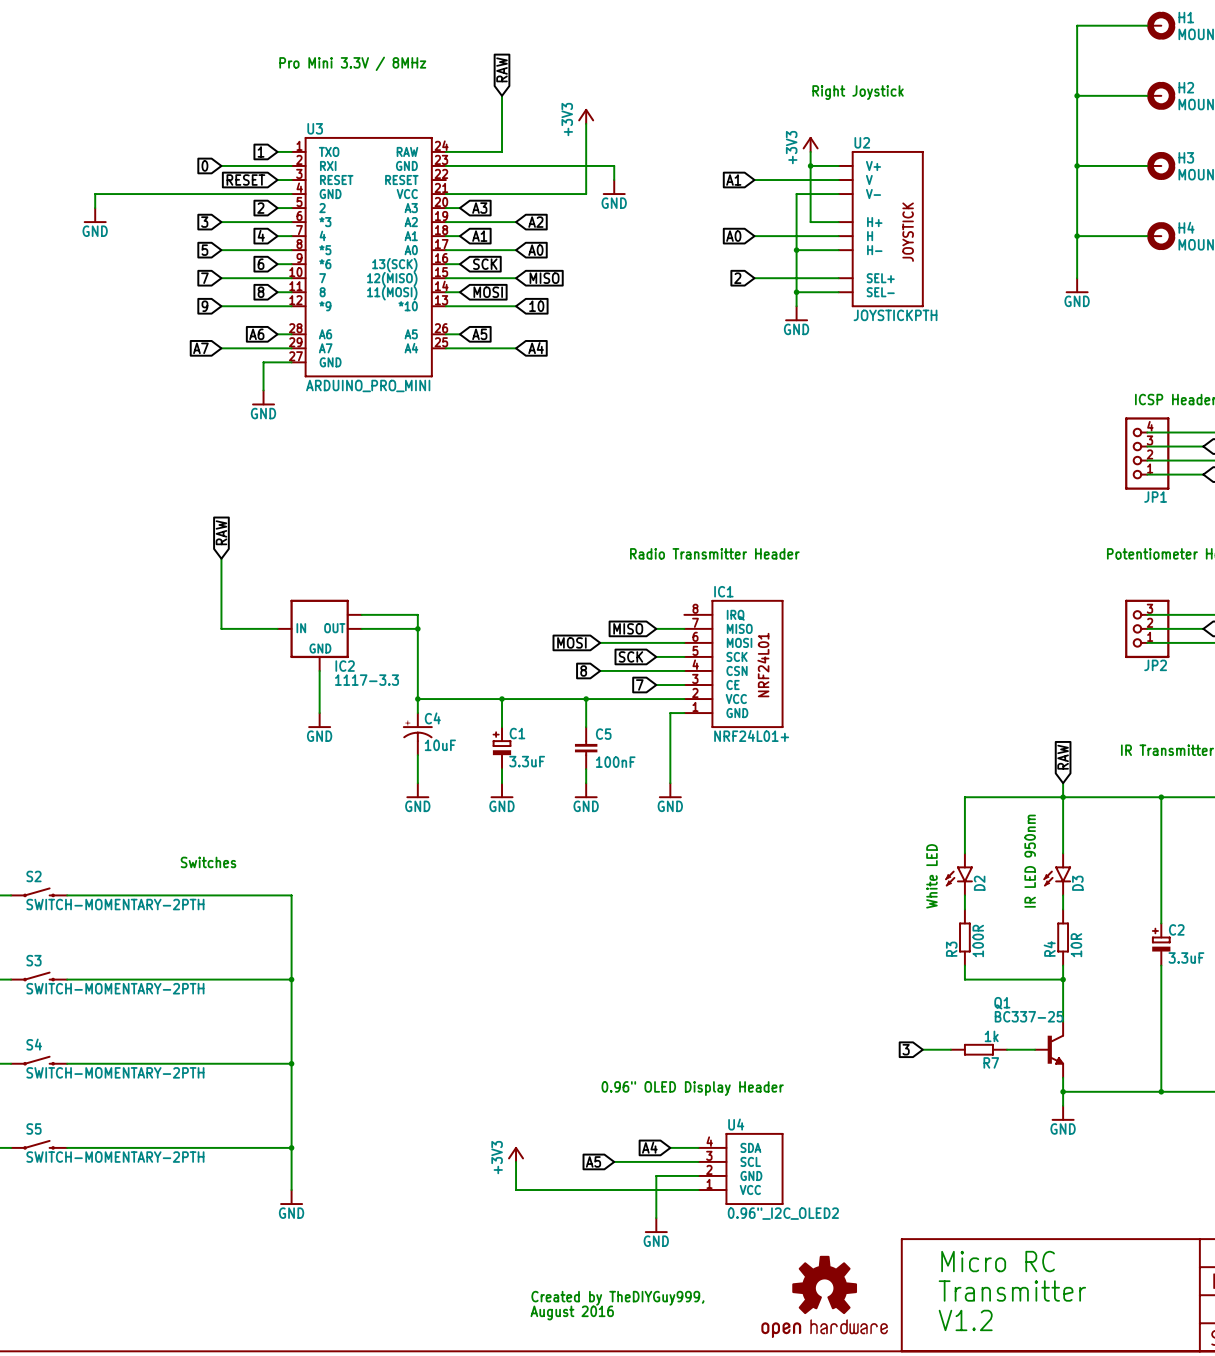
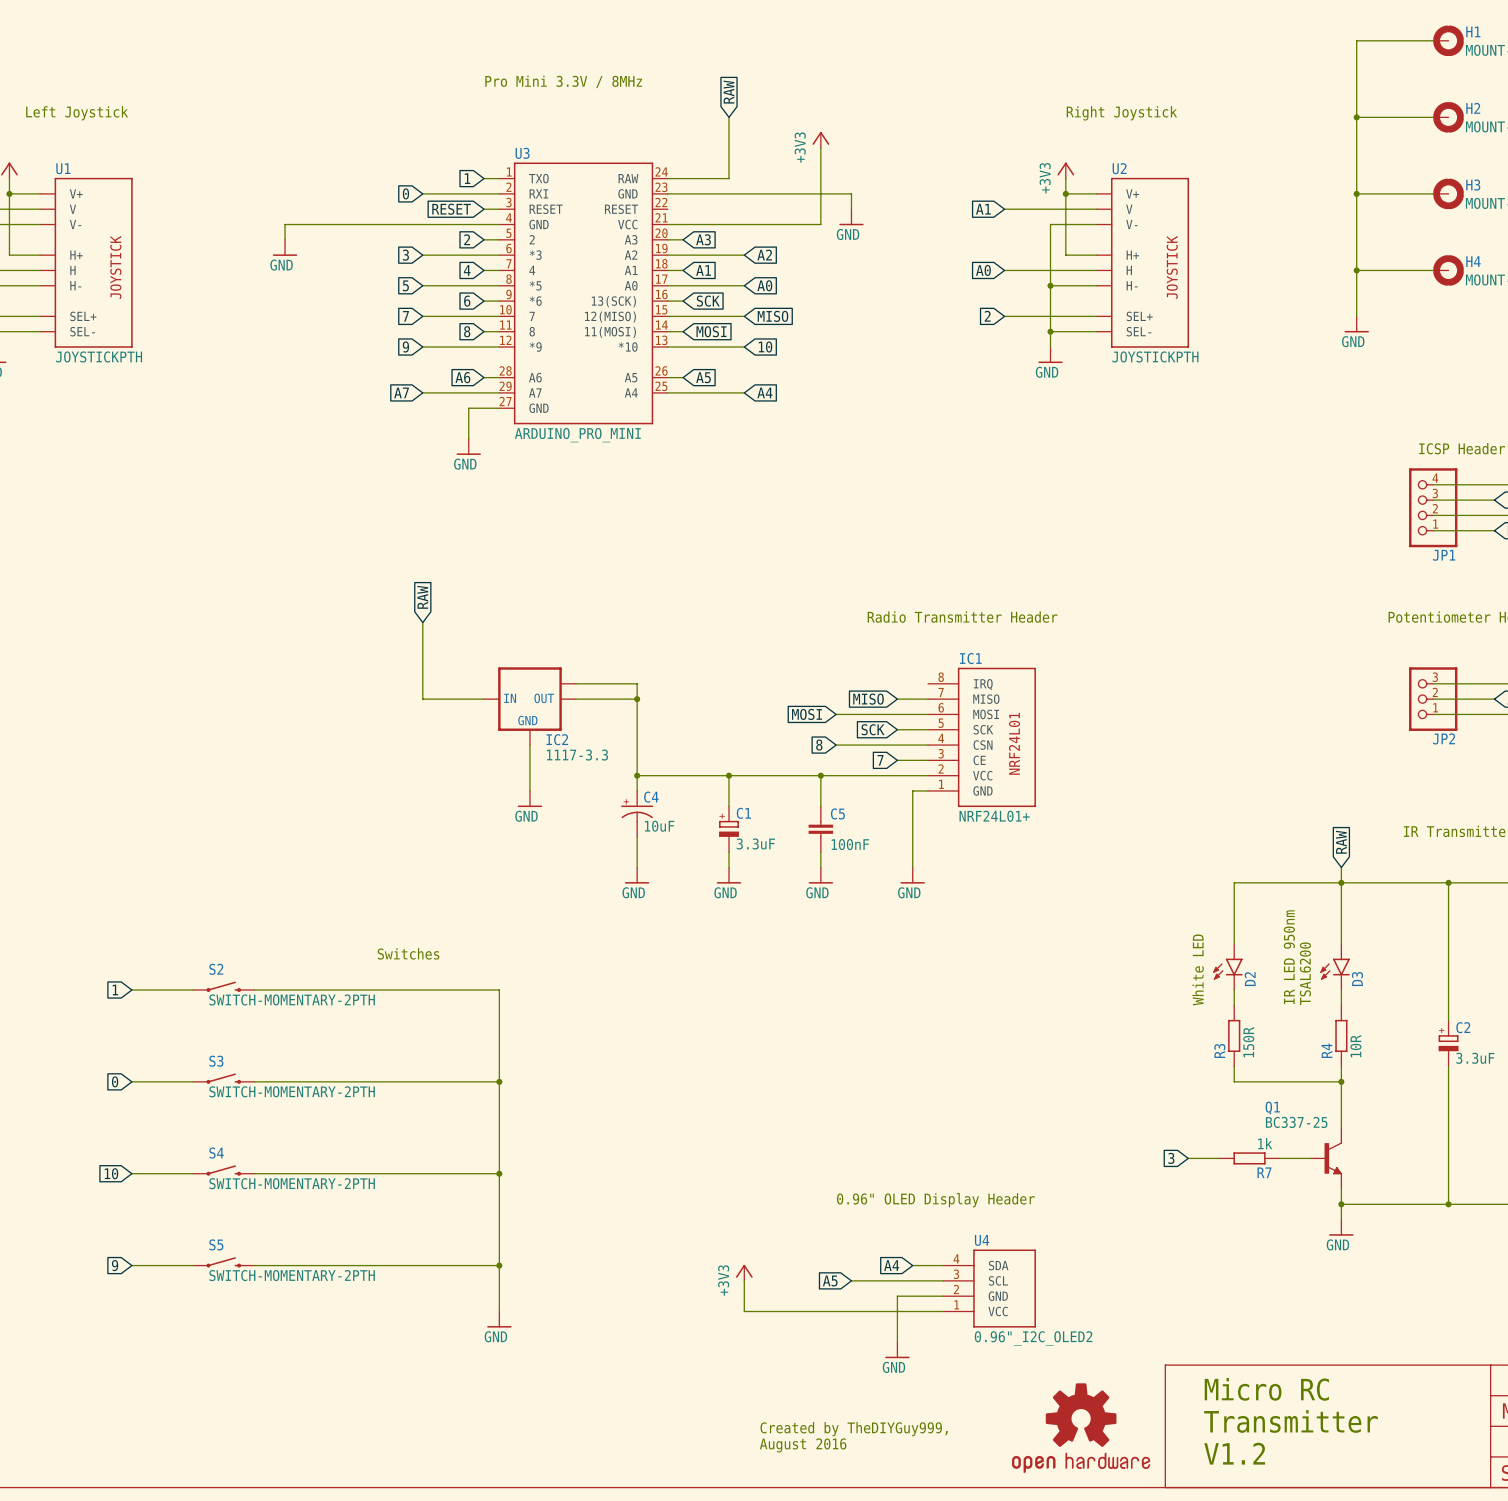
text: none -> IR LED 950nm (1289, 957)
text: IR LED 950nm (1030, 861) -> TSAL6200 (1305, 973)
R3 value: 100R (978, 940) -> 150R (1248, 1042)

